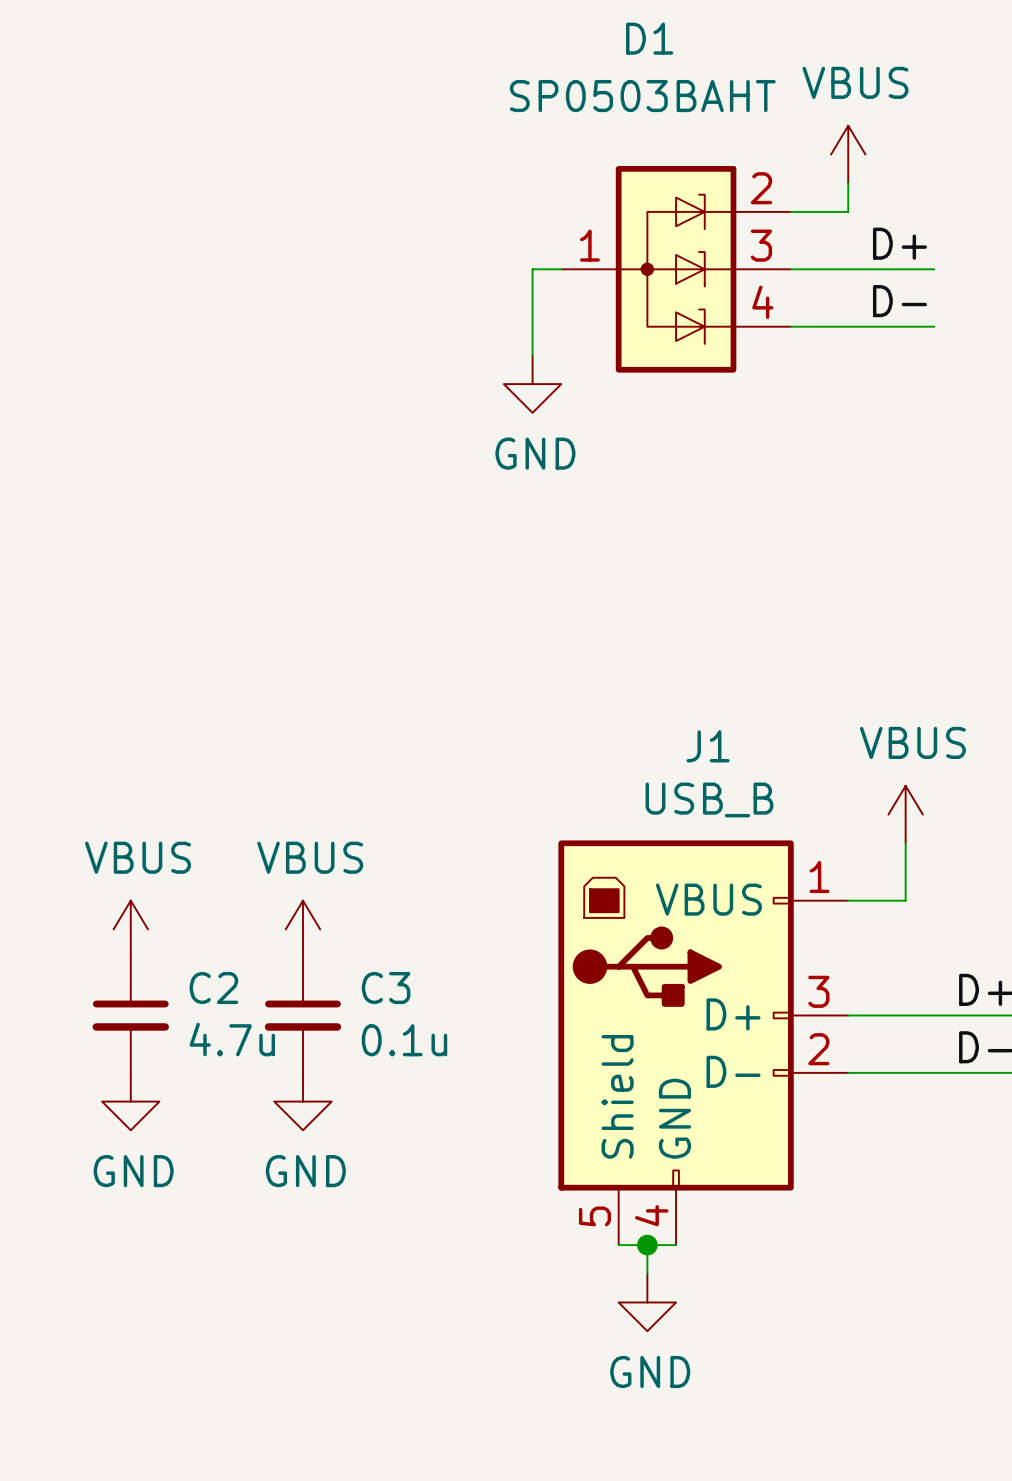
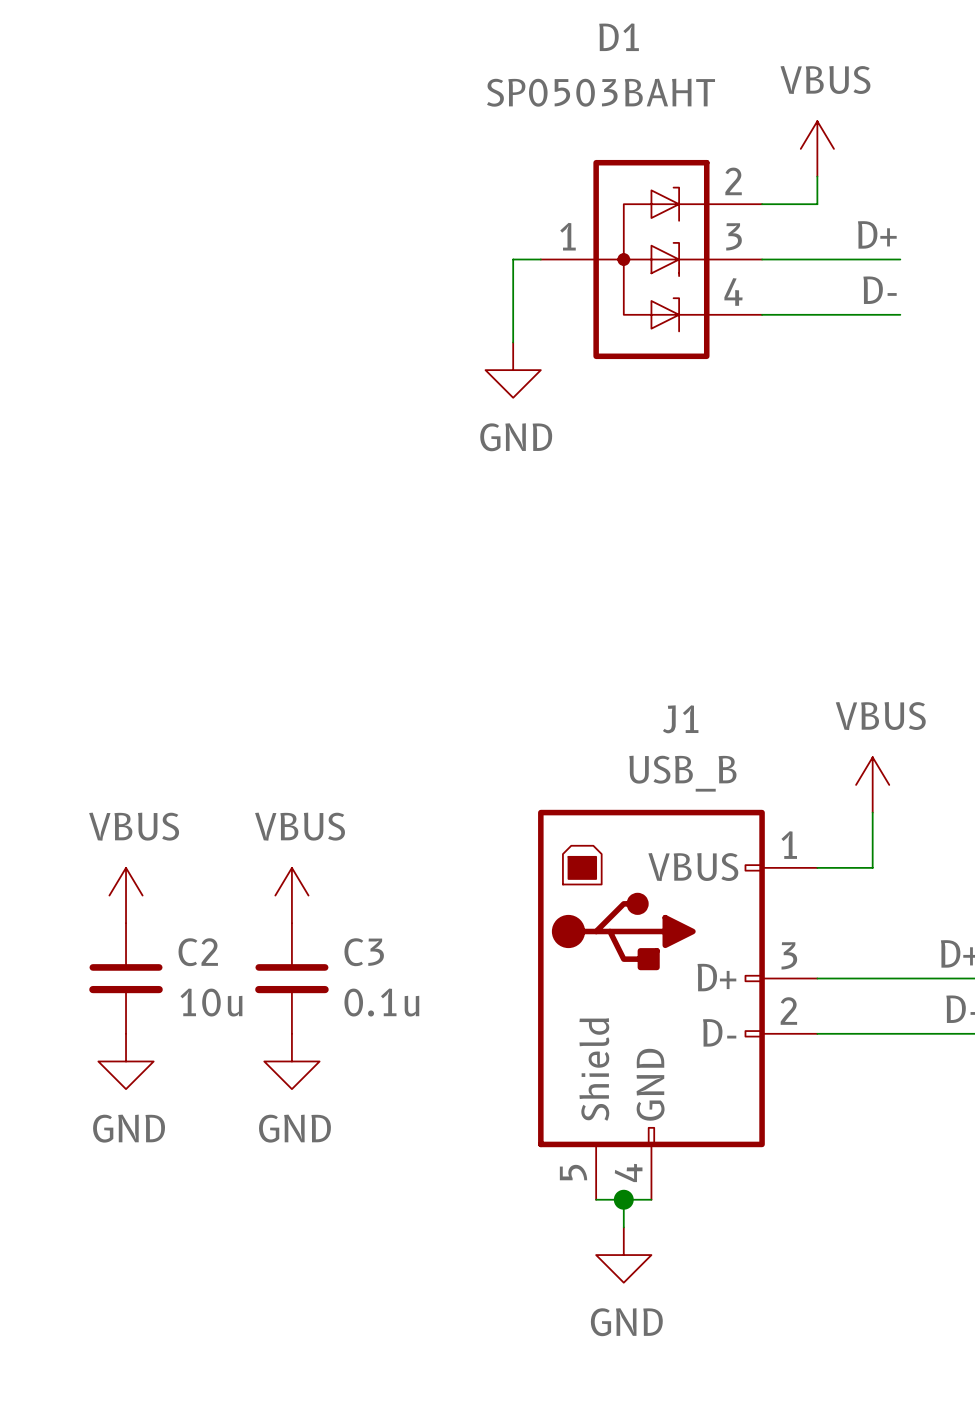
C2 value: 4.7u (232, 1039) -> 10u (211, 1002)

